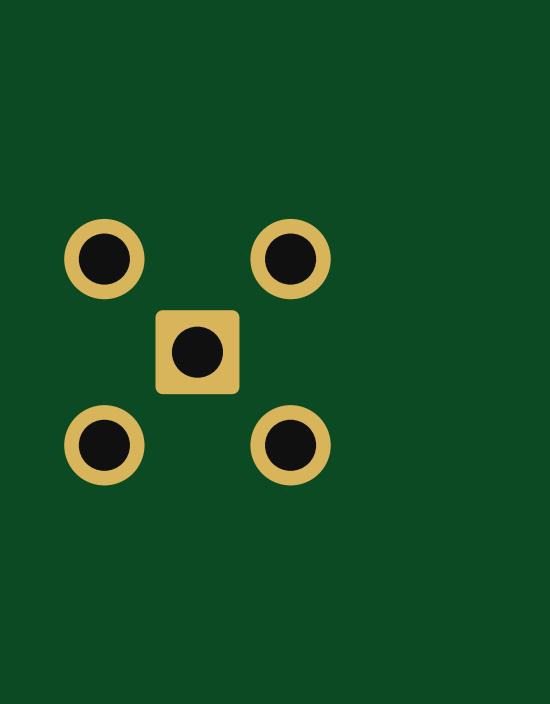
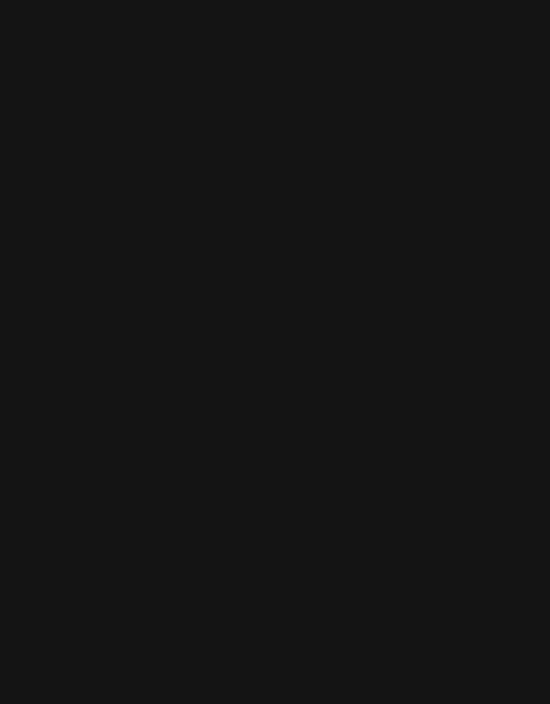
part: (197, 352) -> none

